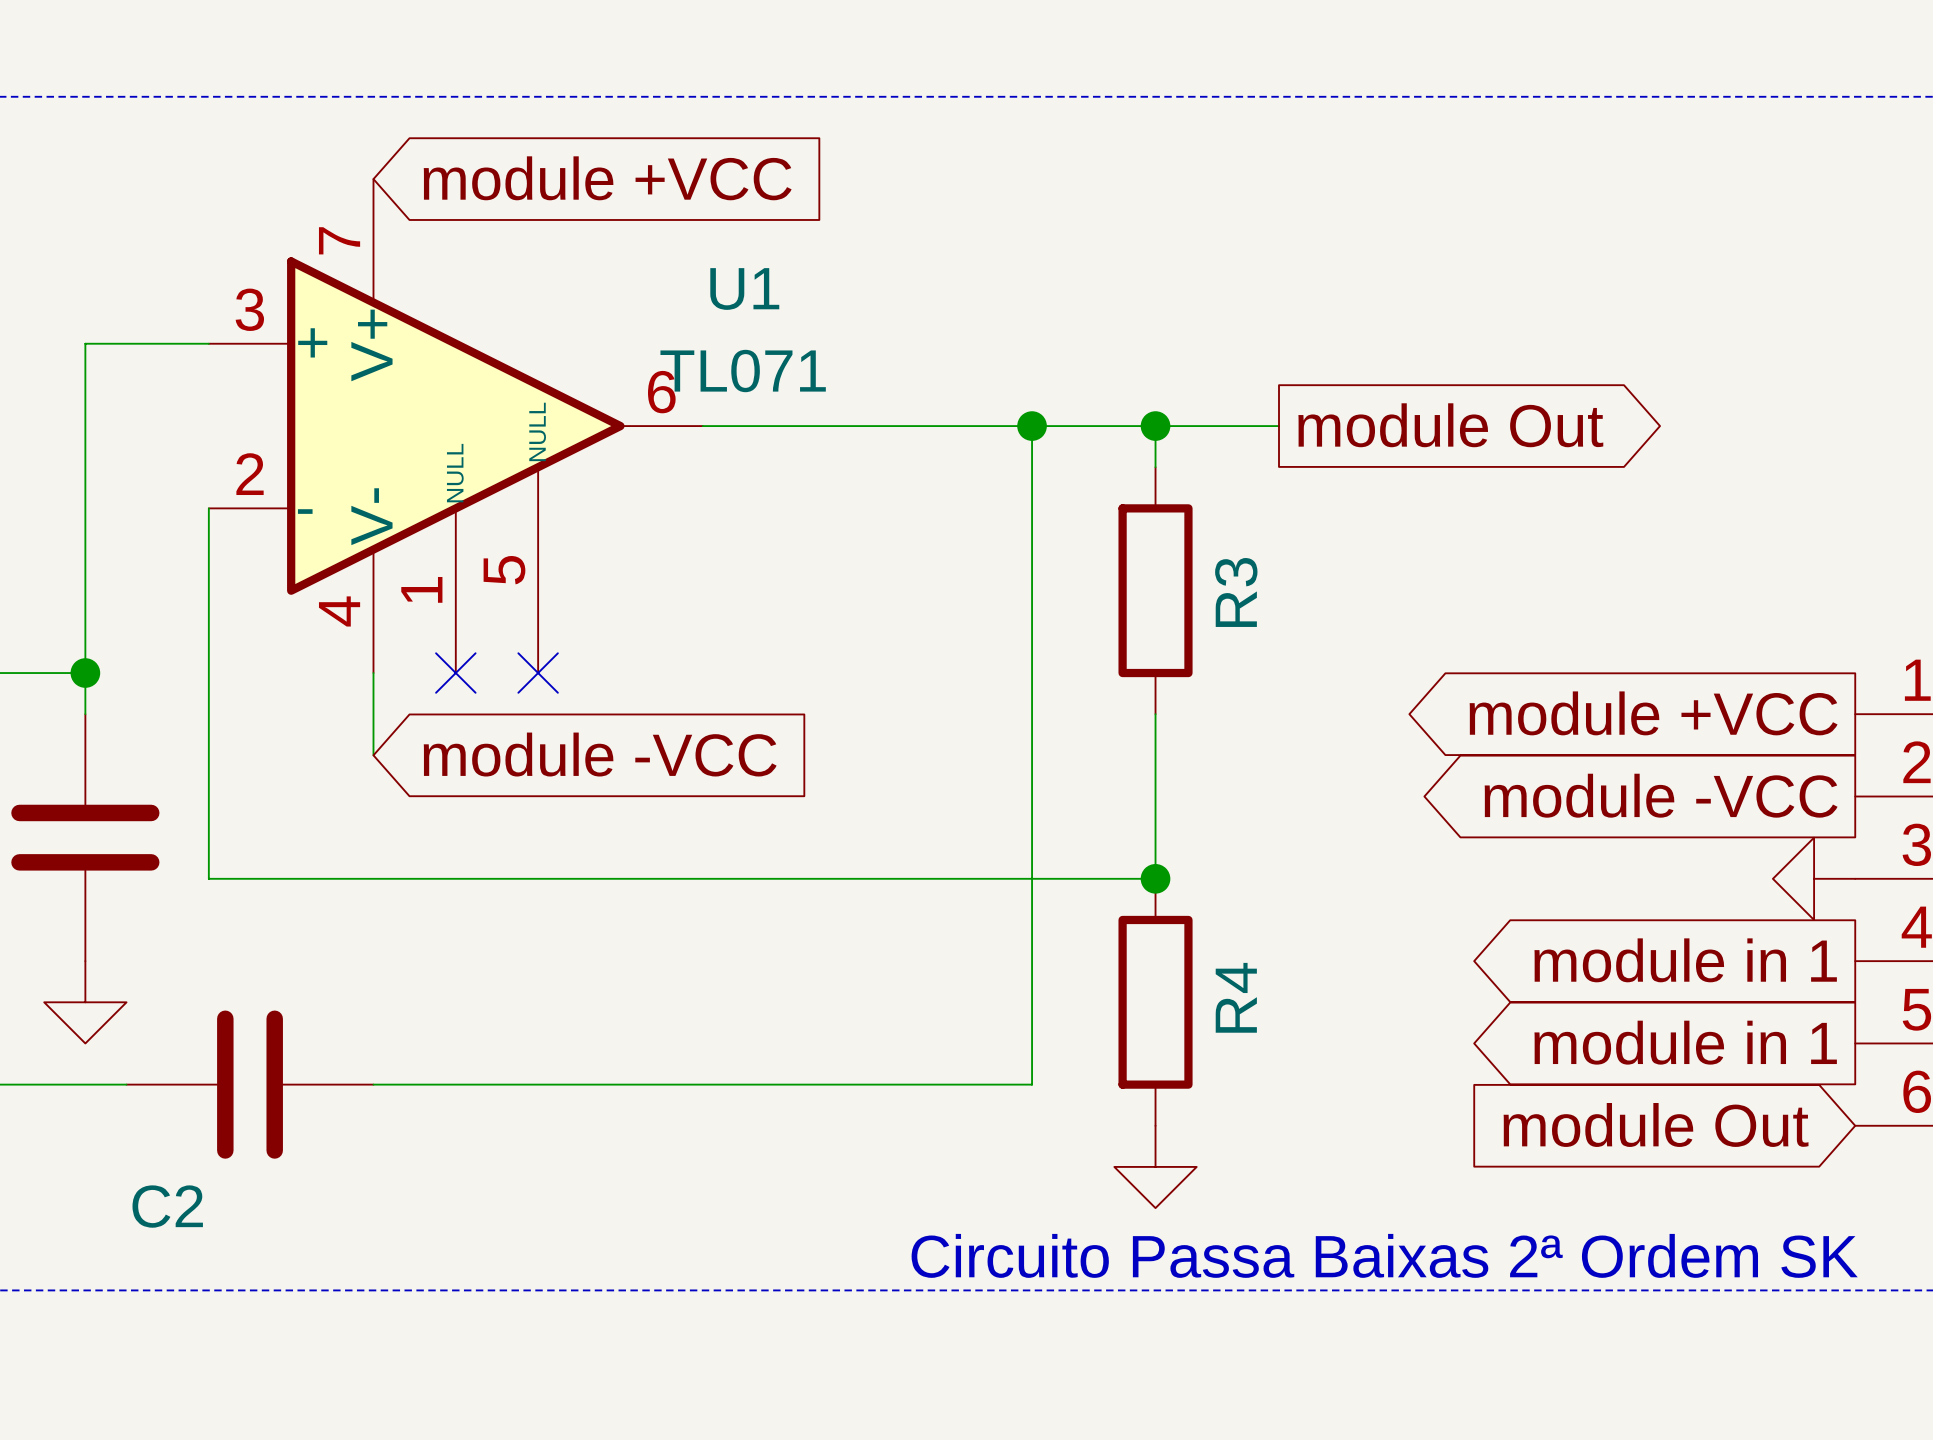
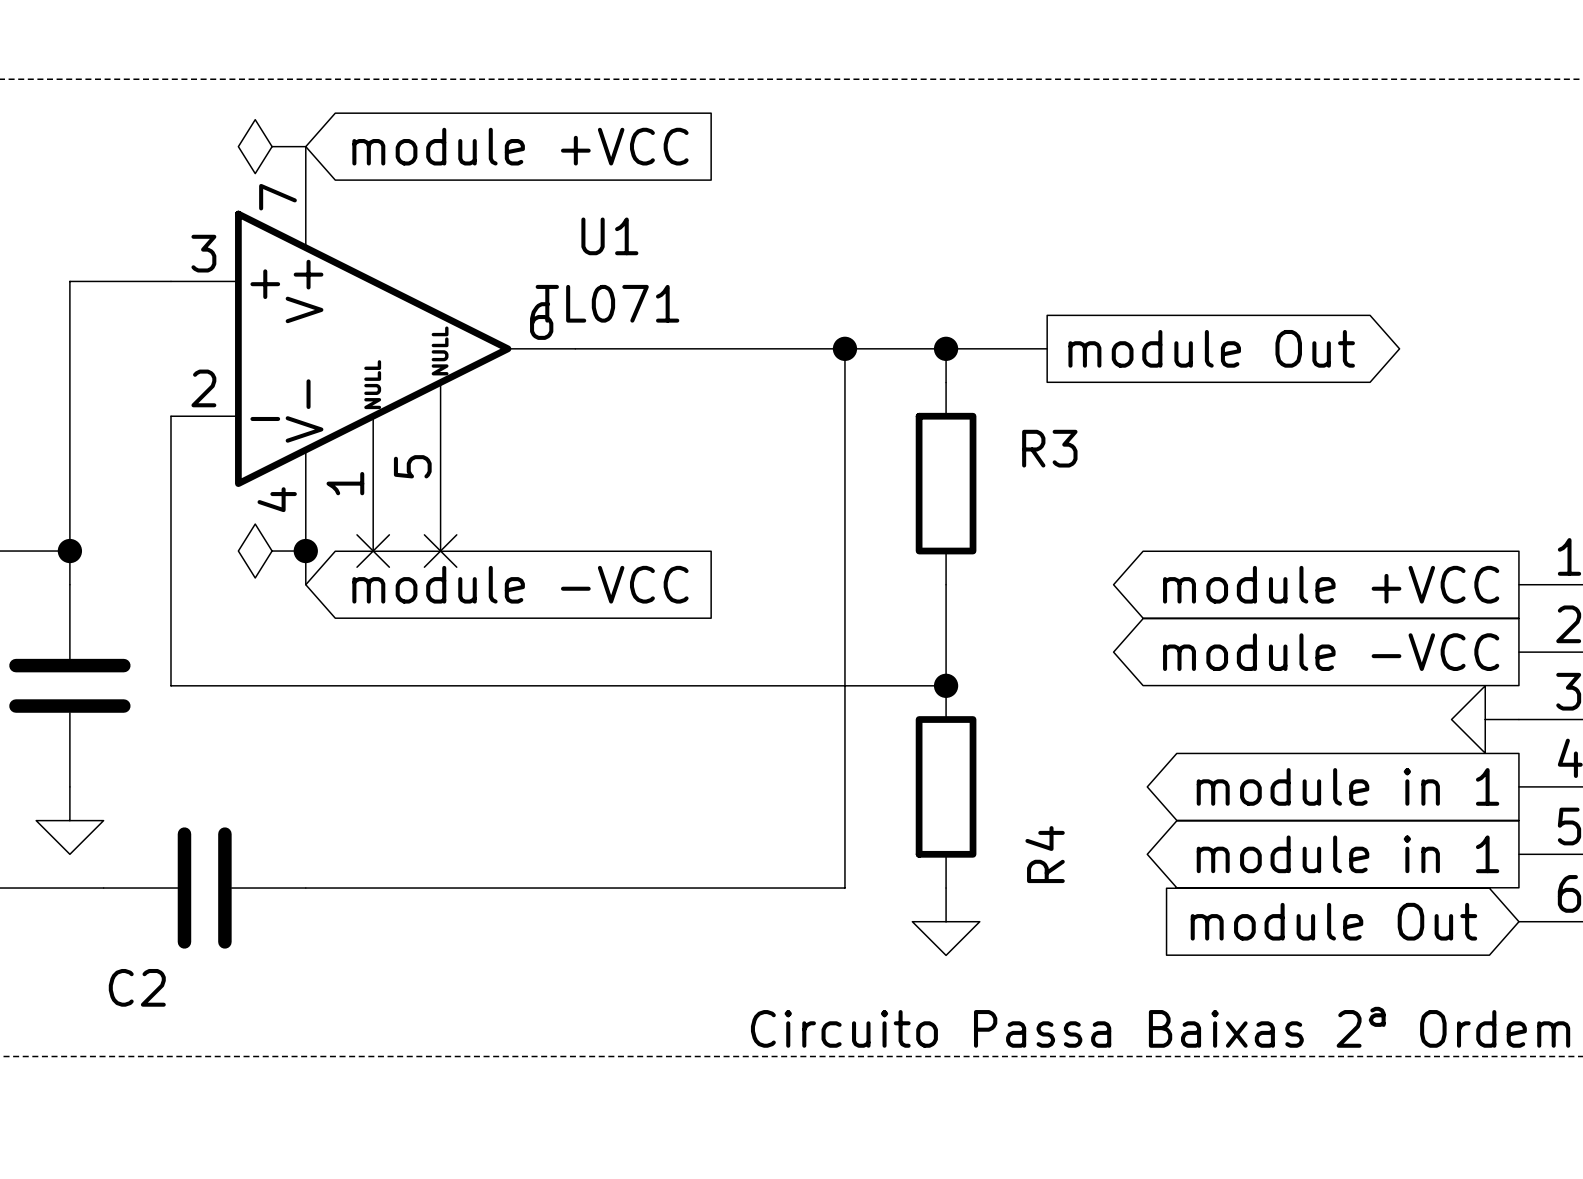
power symbol: none -> (272, 146)
R3 name rotation: 0° (1236, 592) -> 90° clockwise (1049, 448)
power symbol: none -> (272, 551)
junction: none -> (305, 551)
wire: (373, 714) (373, 755) -> none
global label position: module -VCC (600, 754) -> module -VCC (520, 584)
wire: (208, 837) (208, 878) (1155, 878) (1155, 837) -> (170, 685) (946, 685)
junction position: (1155, 878) -> (946, 685)
R4 name position: R4 (1236, 997) -> R4 (1045, 854)
R4 position: (1155, 1002) -> (946, 786)
power symbol position: (1155, 1166) -> (946, 921)

